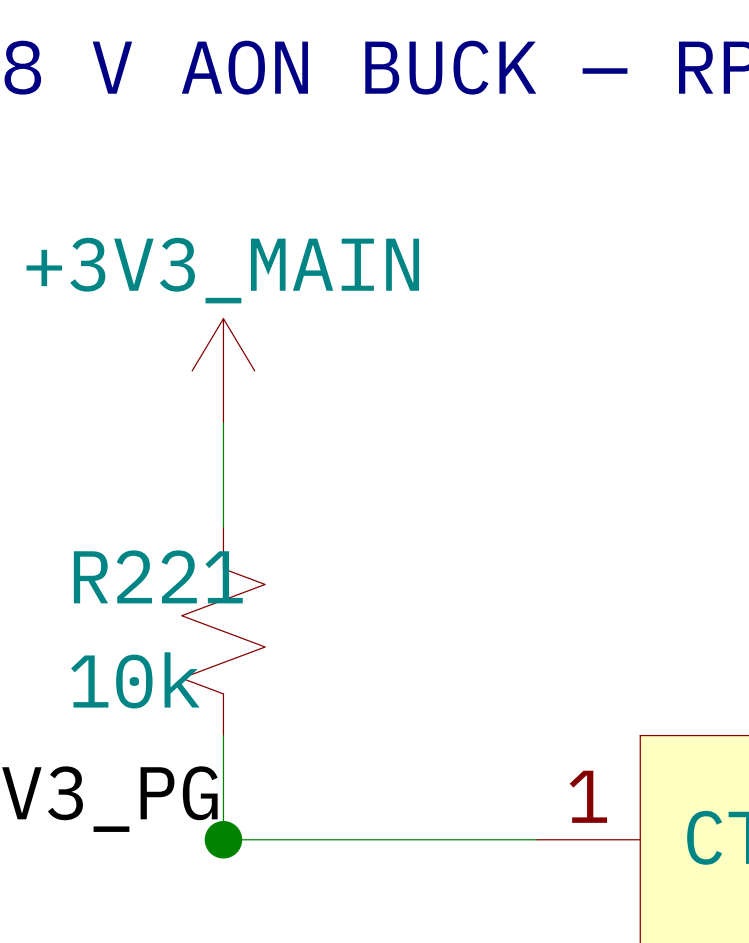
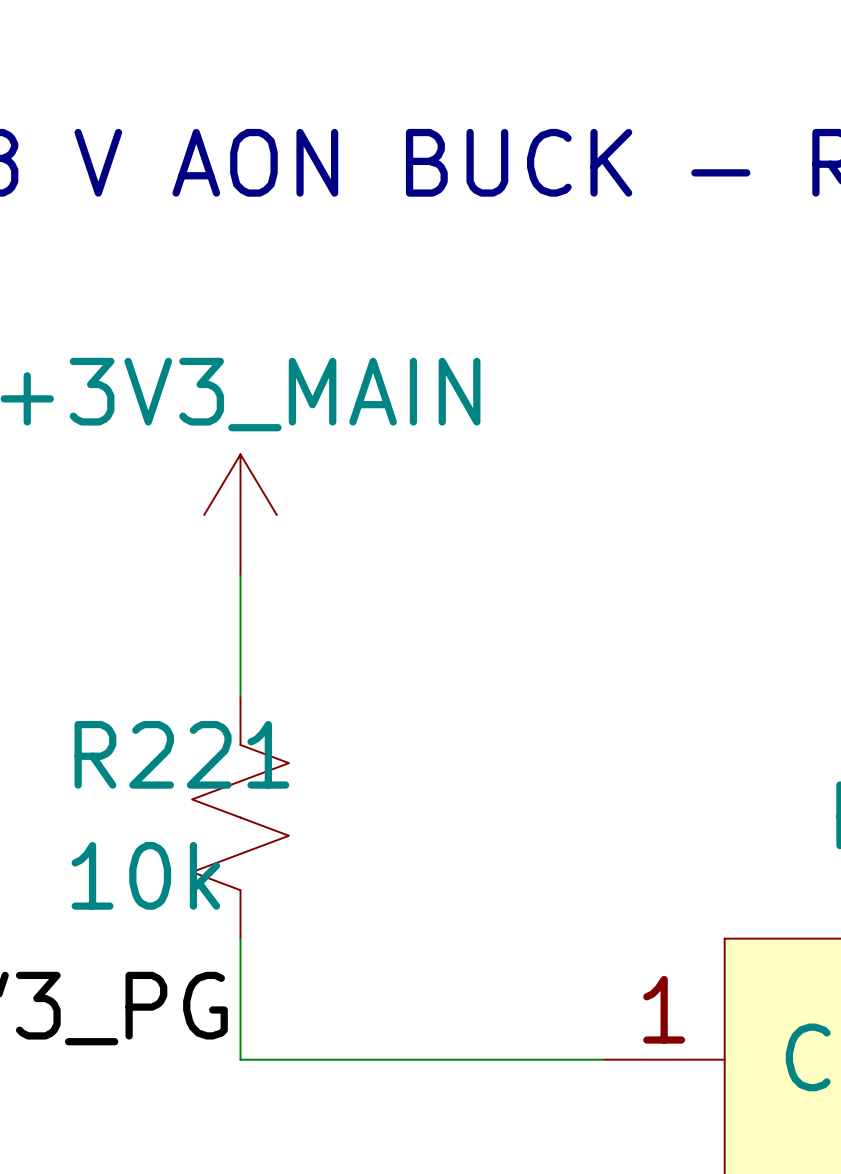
junction: (223, 839) -> none

